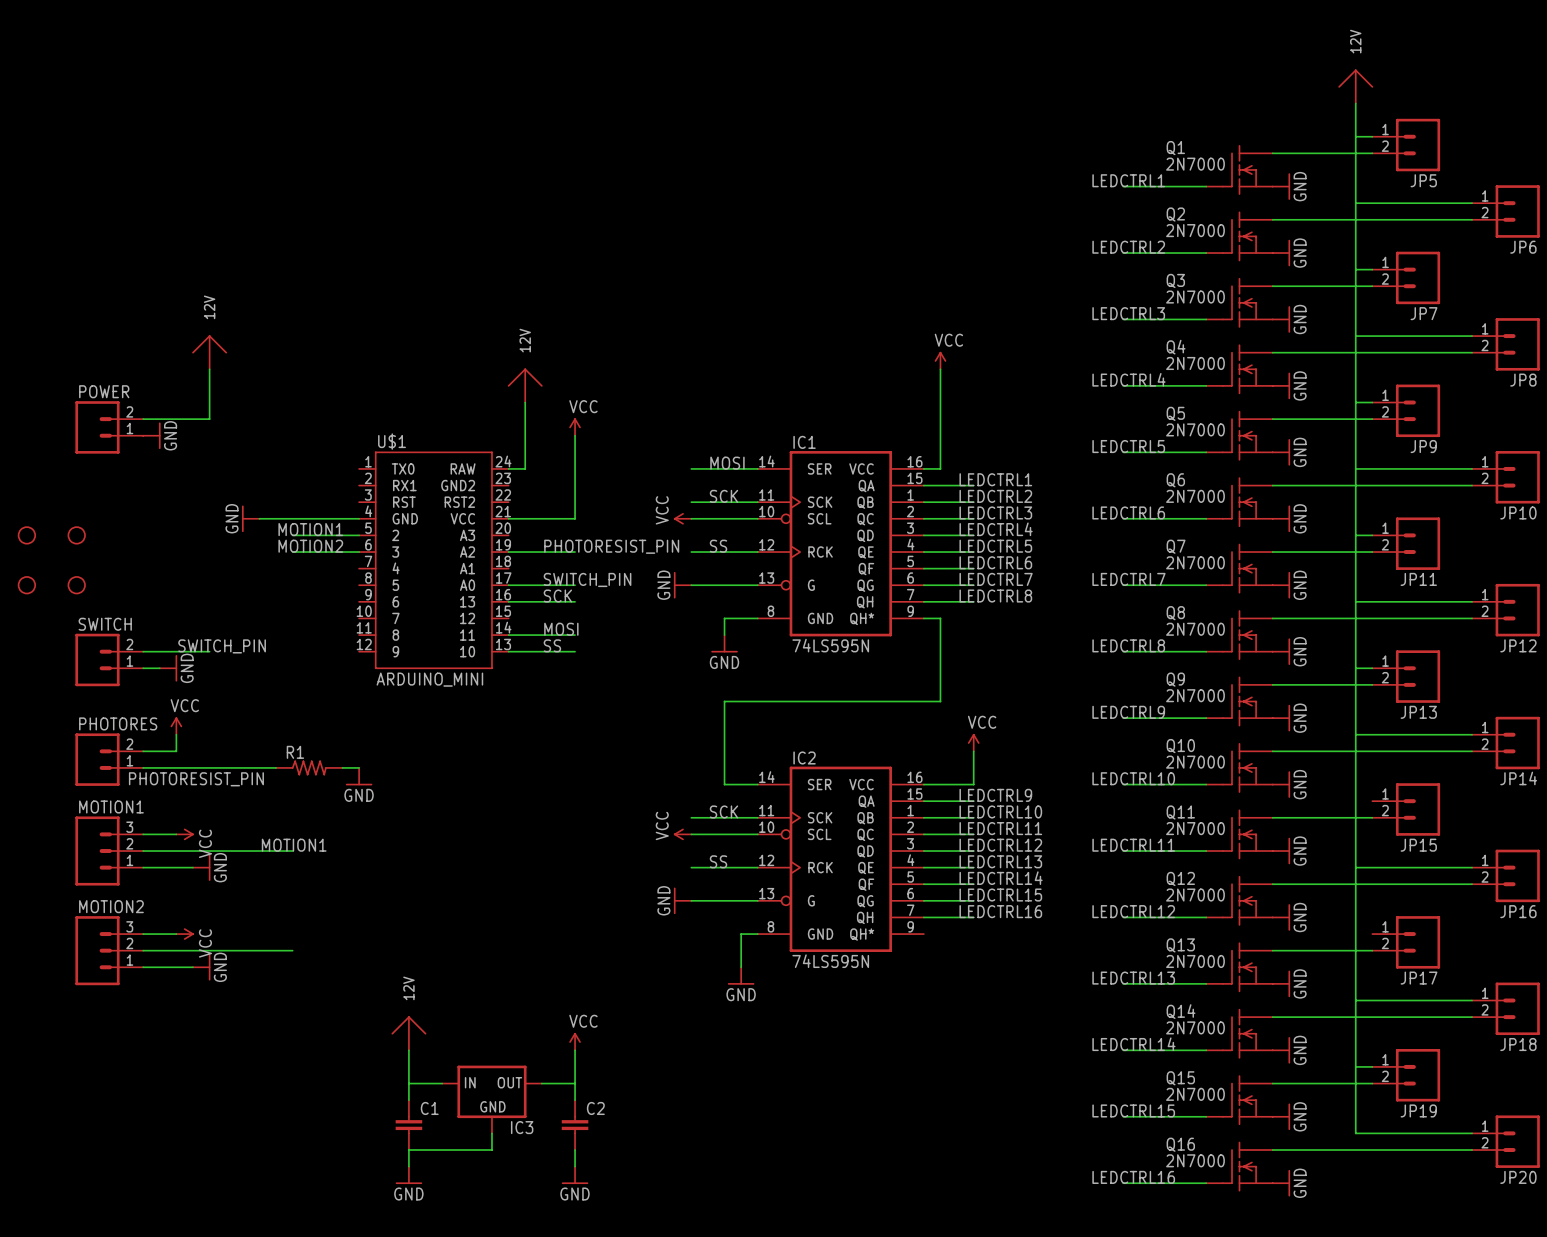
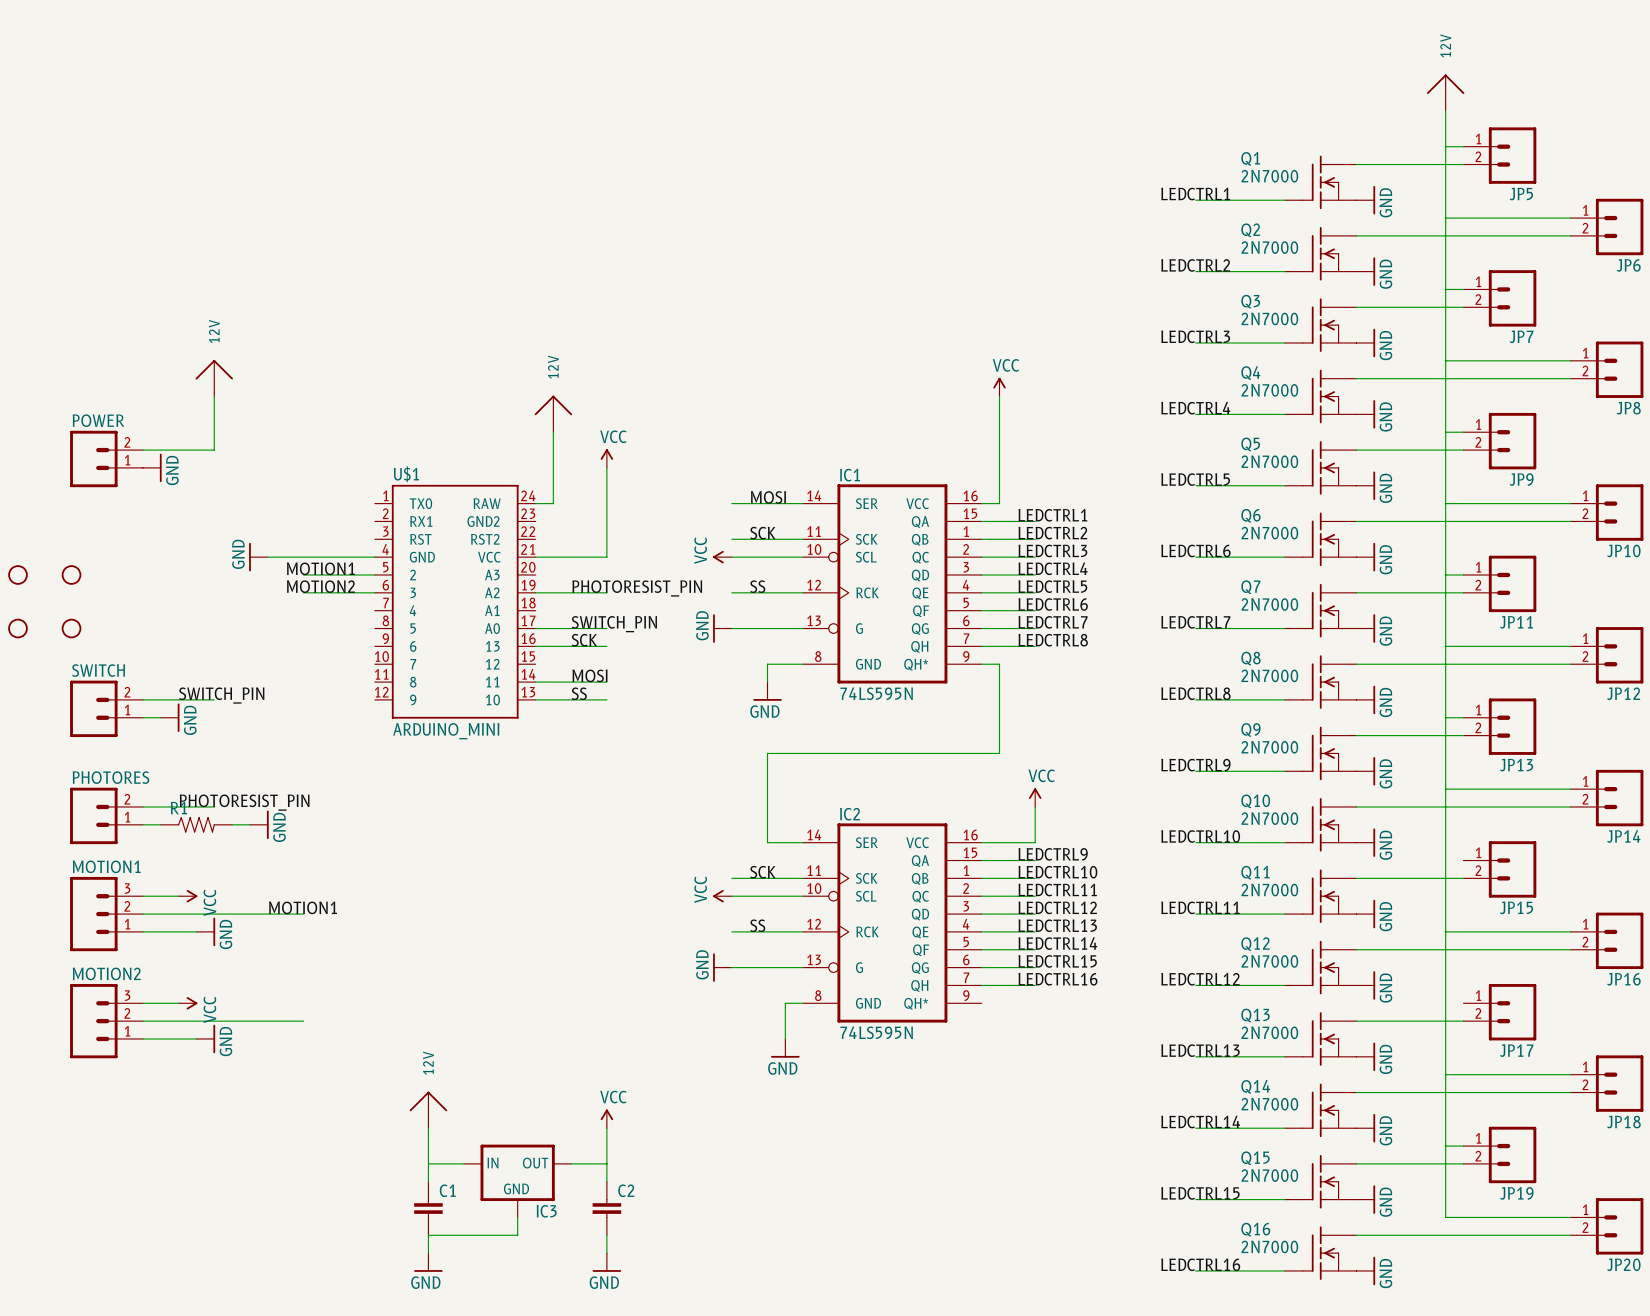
power symbol: VCC (176, 726) -> none
wire: (176, 734) (176, 751) -> (214, 806) (178, 806)
R1 position: (309, 767) -> (196, 824)
wire: (342, 767) (359, 767) -> none
power symbol position: GND (359, 776) -> GND (259, 824)
label position: PHOTORESIST_PIN (196, 779) -> PHOTORESIST_PIN (244, 802)
power symbol rotation: 0° (359, 784) -> 90° counterclockwise (267, 824)

